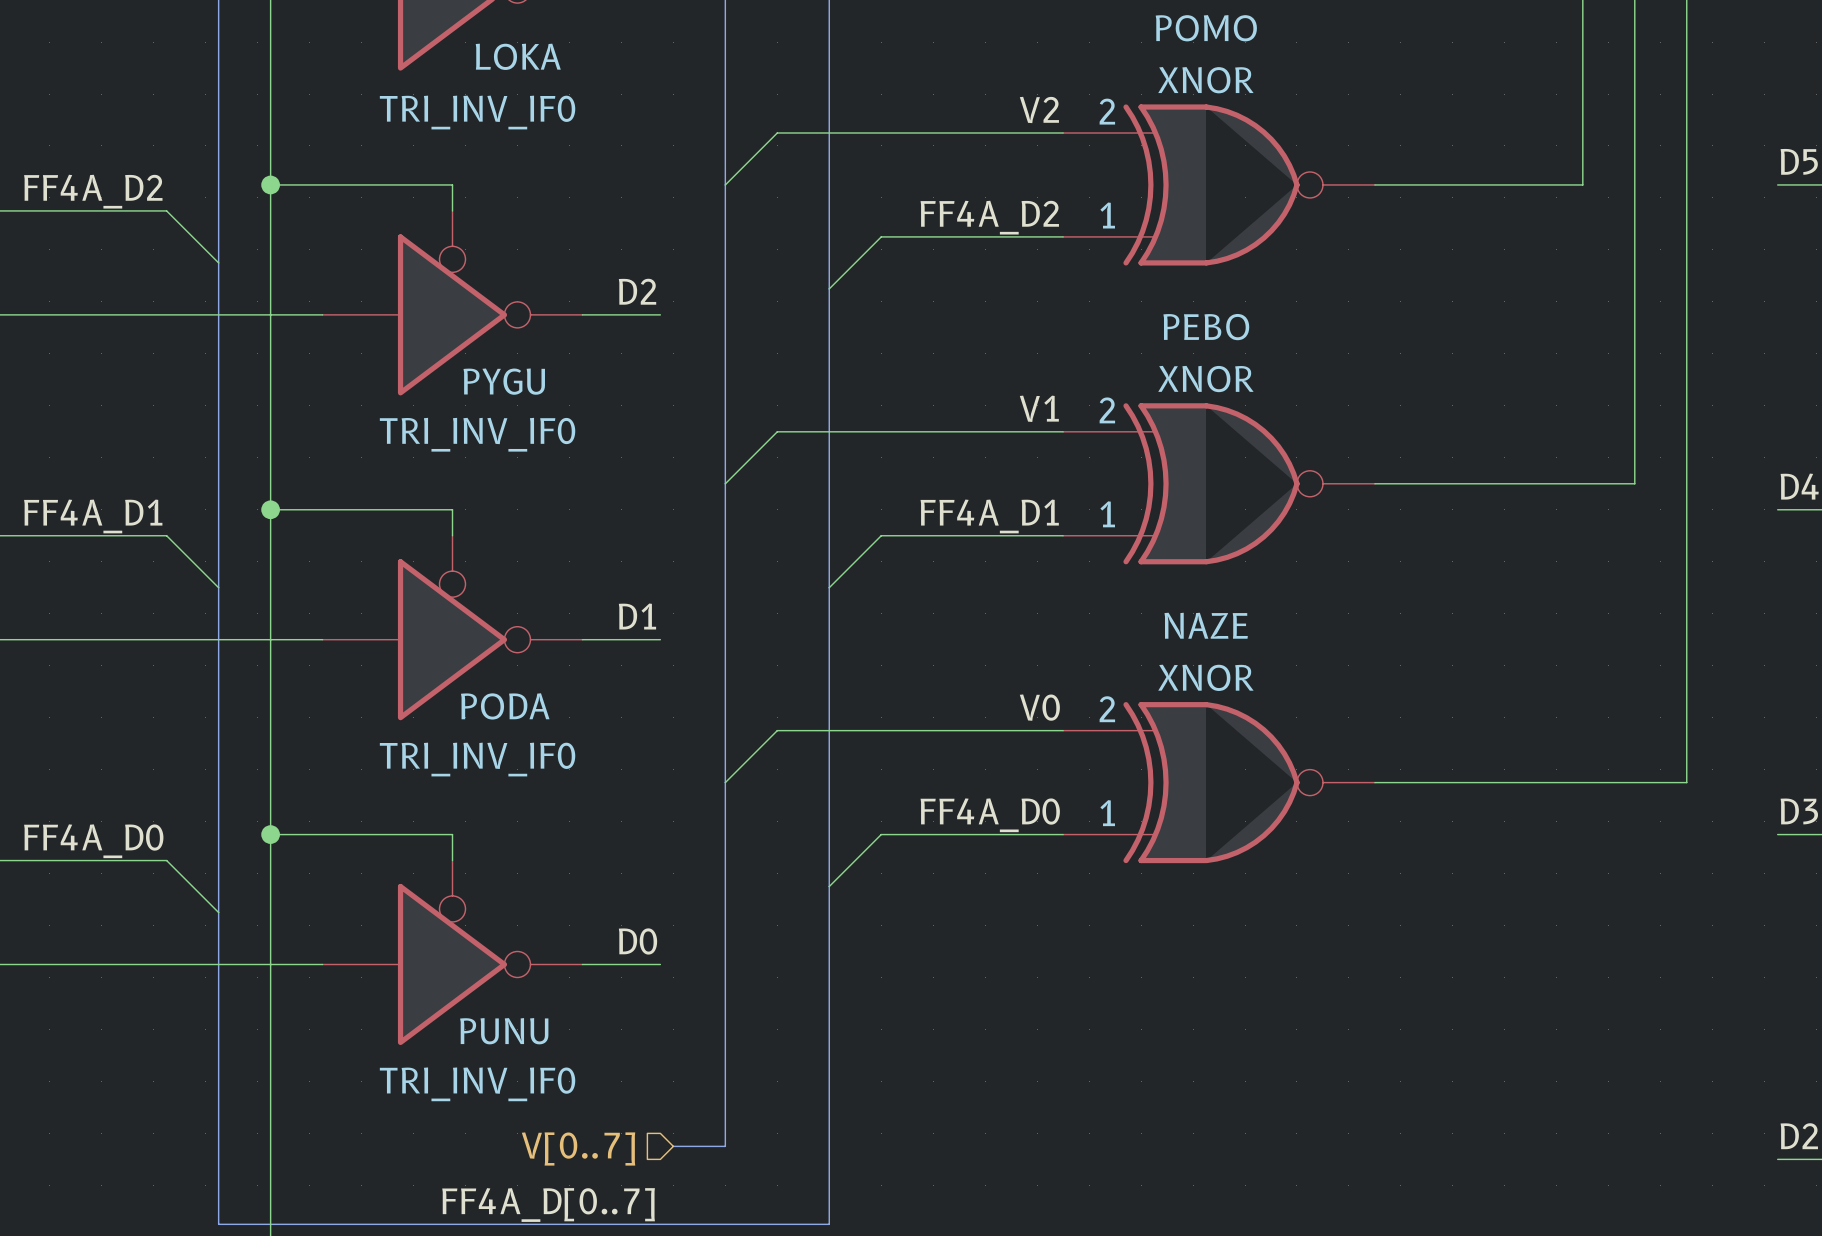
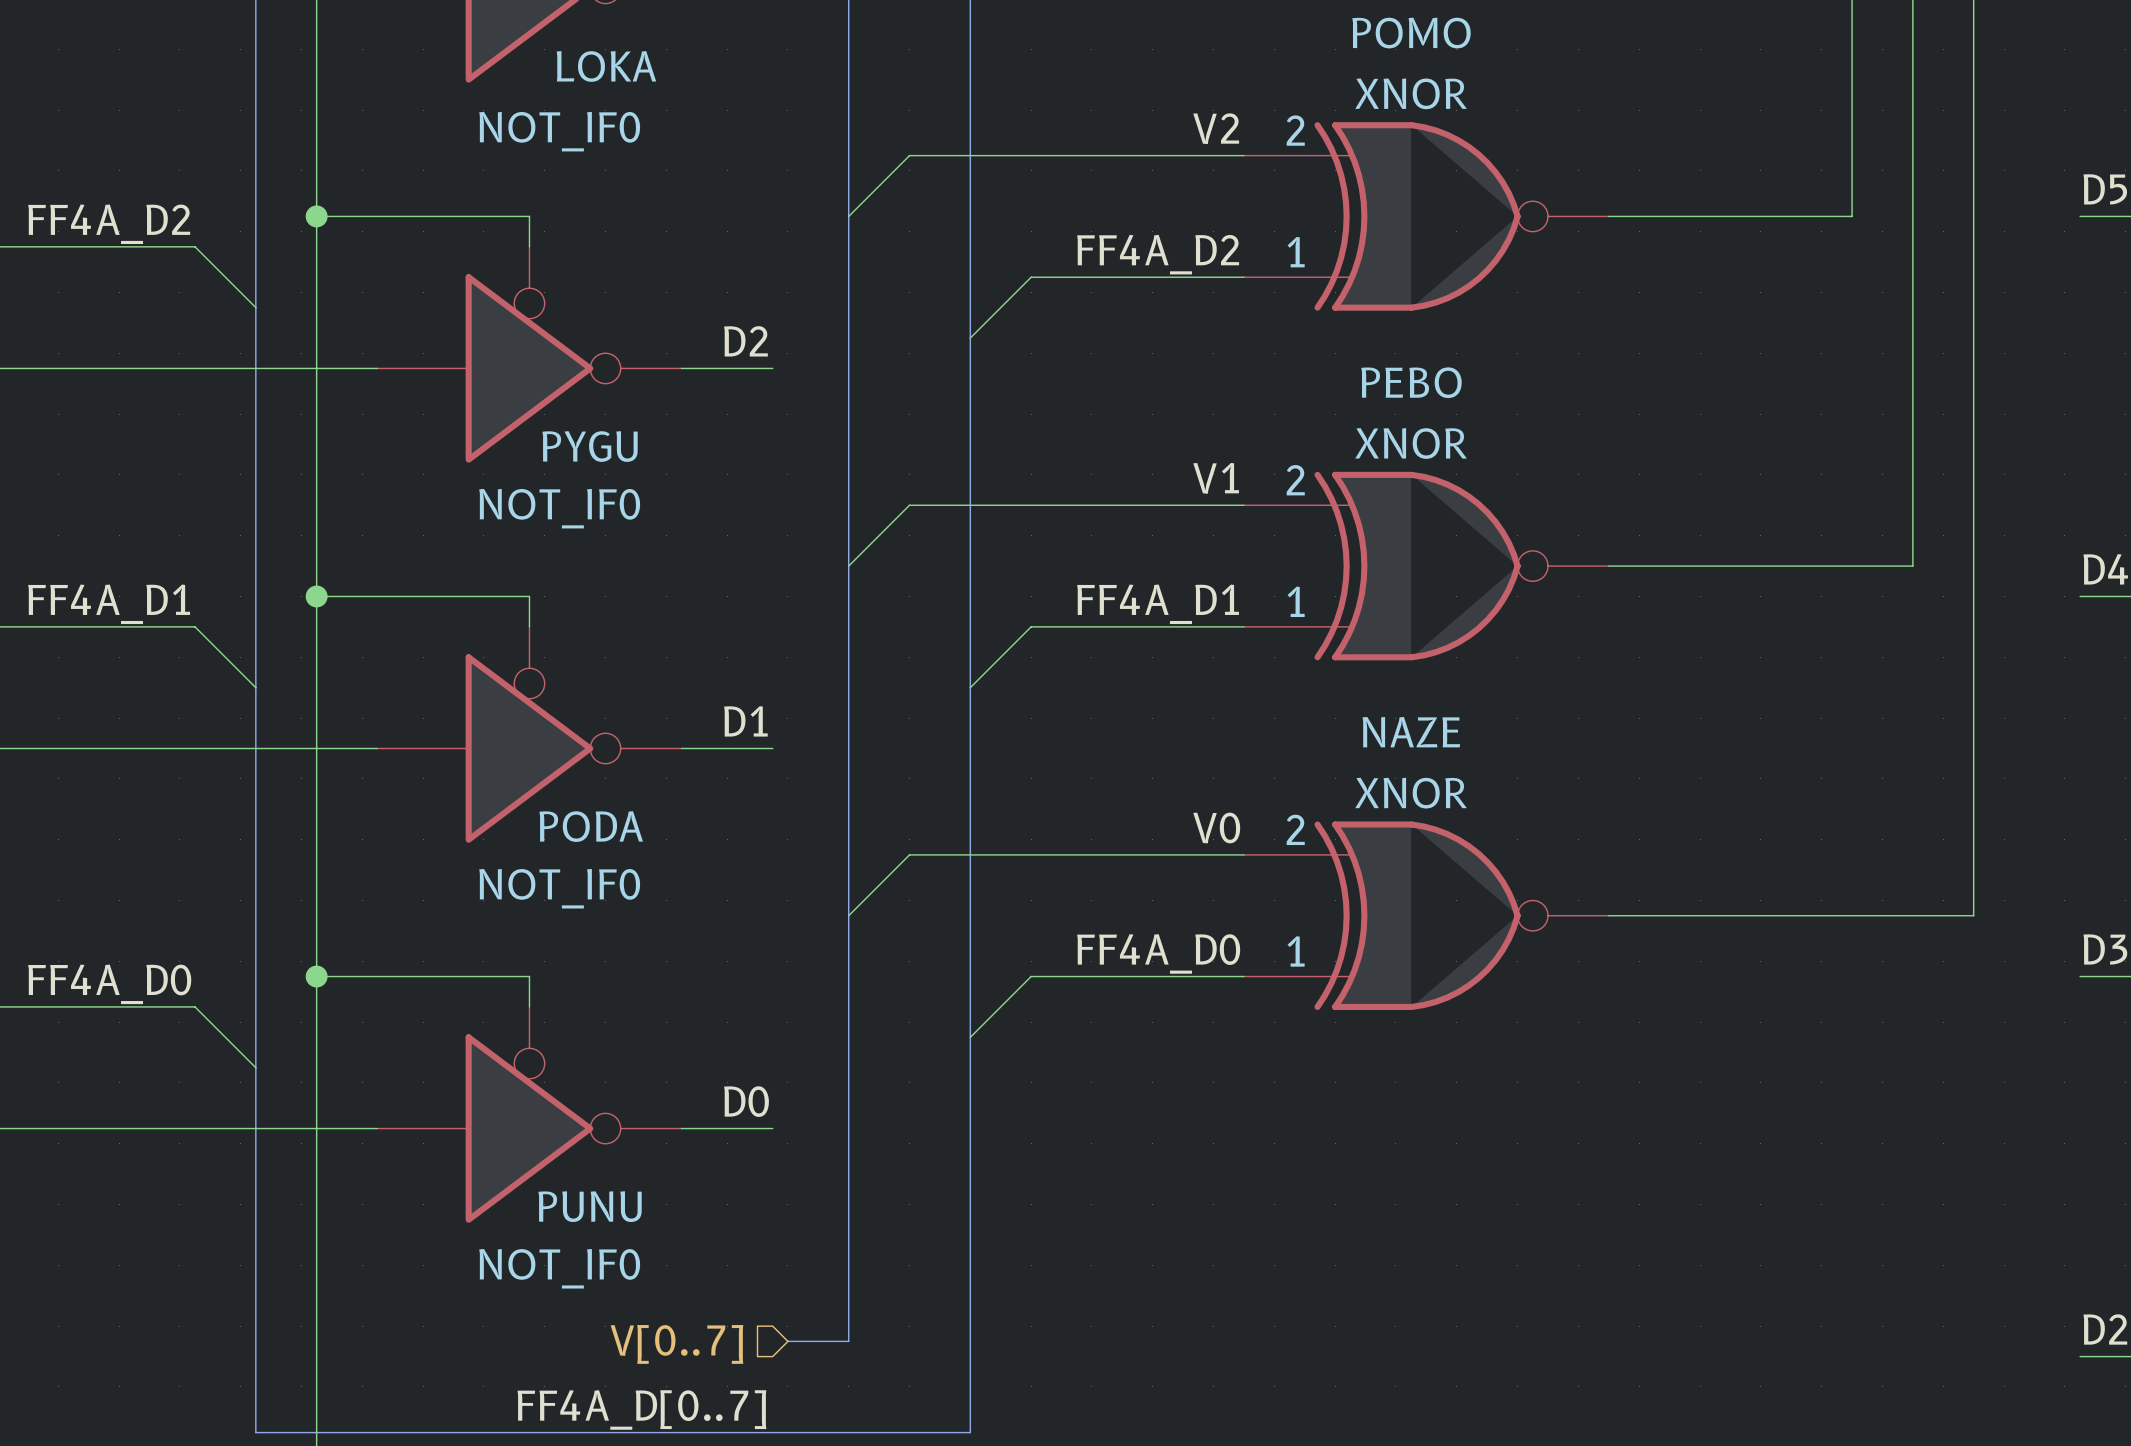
LOKA value: TRI_INV_IF0 (477, 112) -> NOT_IF0 (559, 131)
PYGU value: TRI_INV_IF0 (477, 434) -> NOT_IF0 (559, 508)
PODA value: TRI_INV_IF0 (477, 759) -> NOT_IF0 (559, 888)
PUNU value: TRI_INV_IF0 (477, 1084) -> NOT_IF0 (559, 1268)

